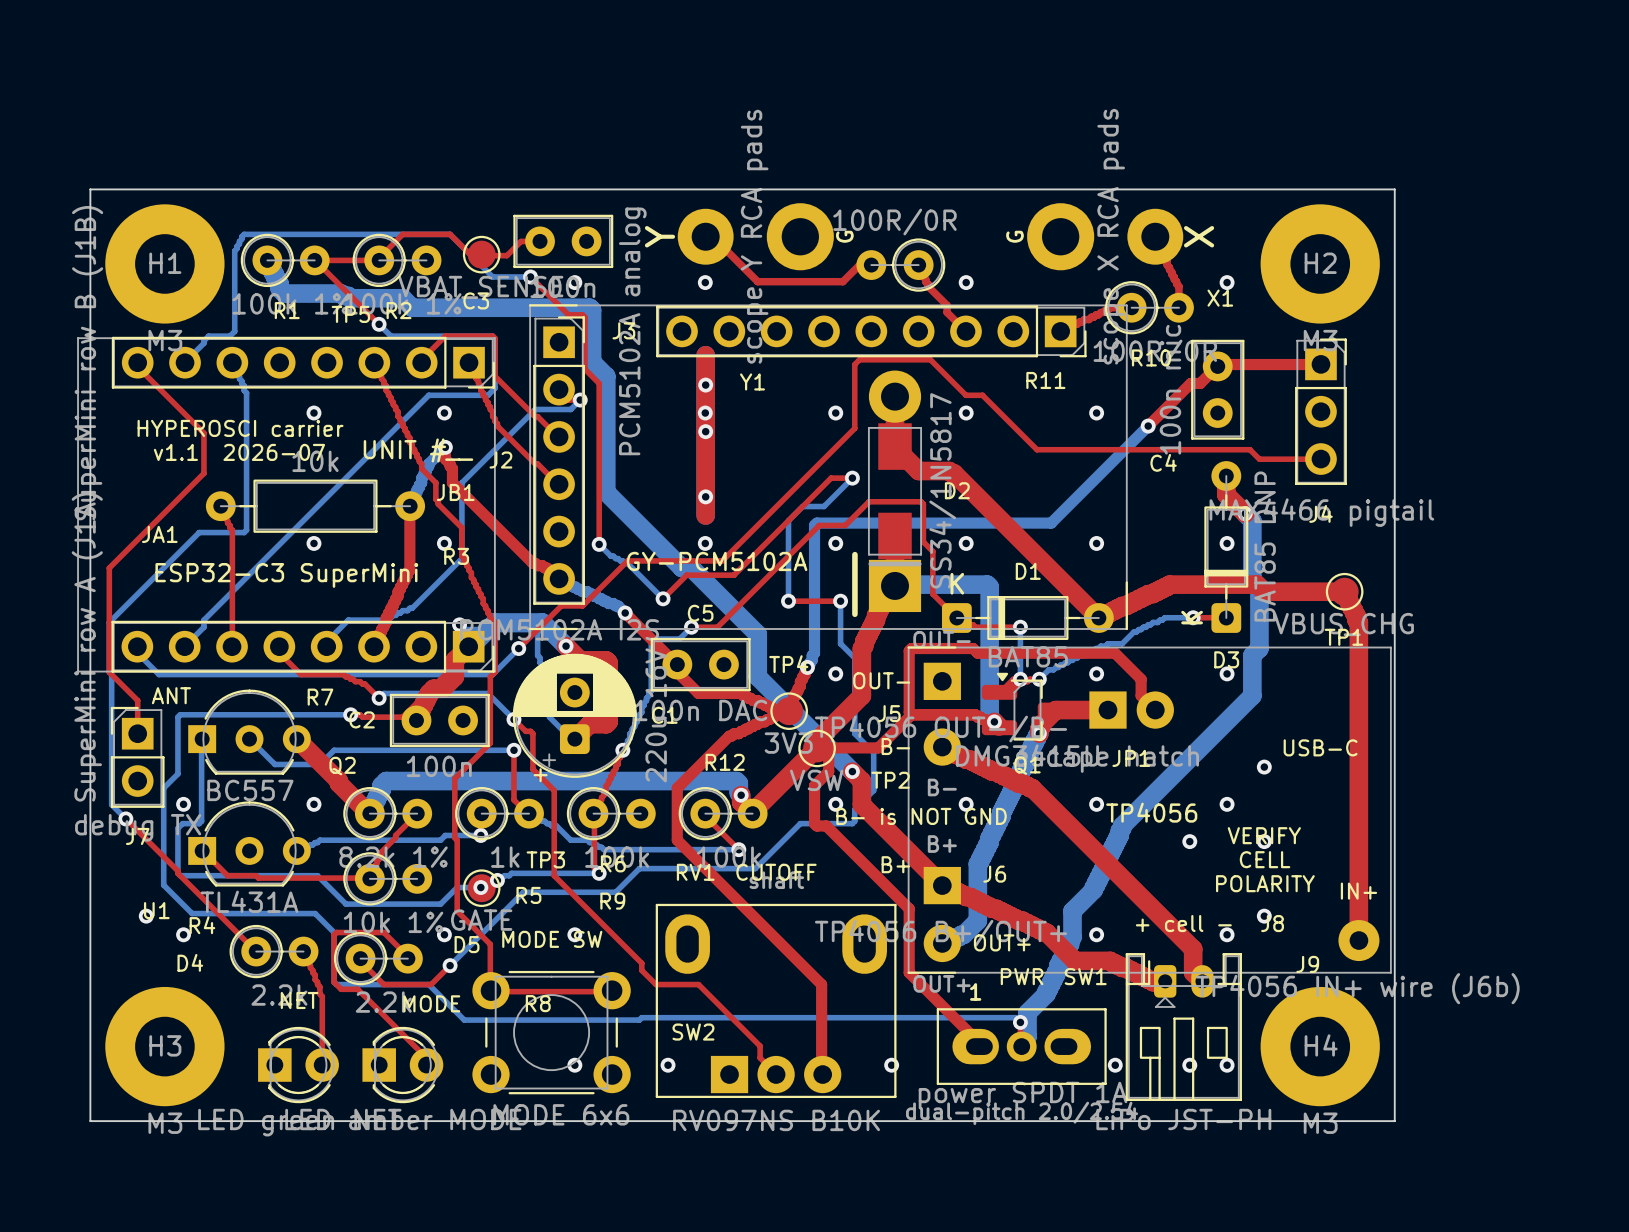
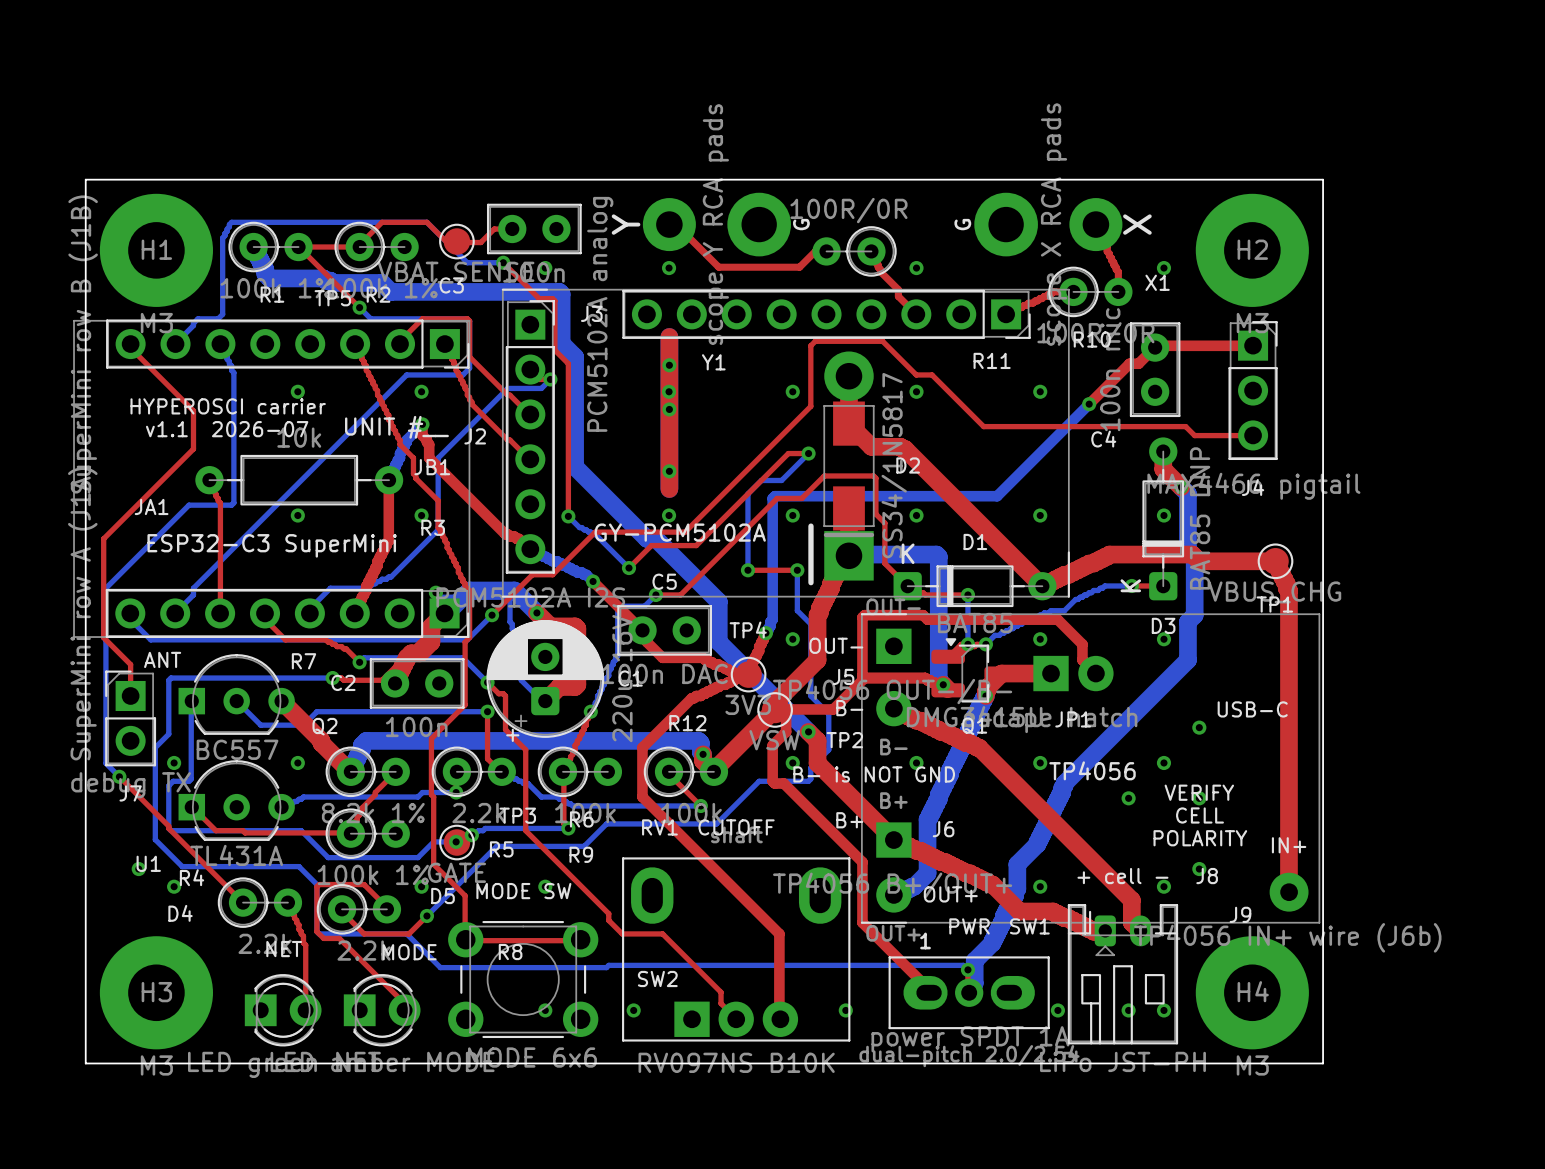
R9 value: 1k (505, 857) -> 2.2k (478, 813)
R8 value: 10k 1% (393, 922) -> 100k 1% (373, 874)

